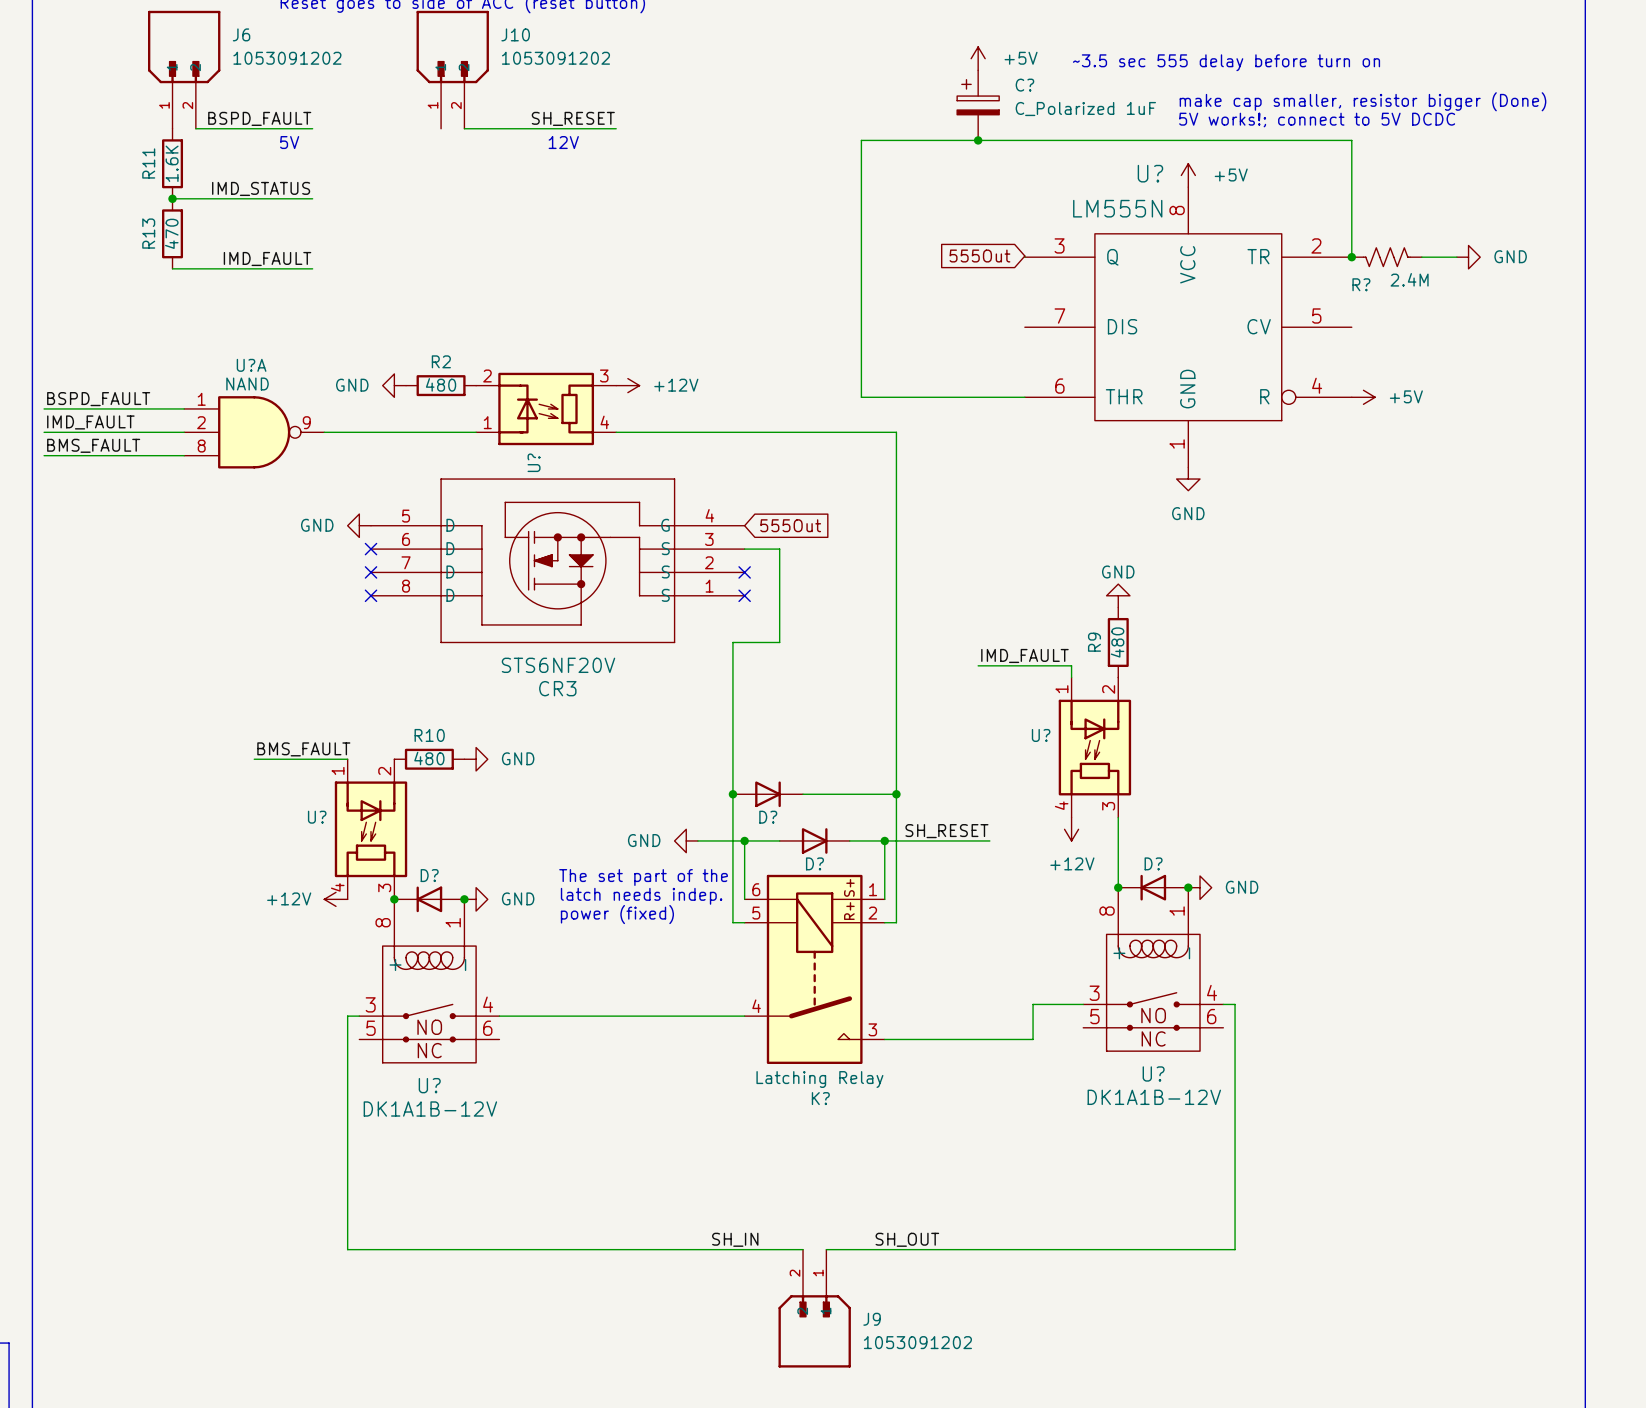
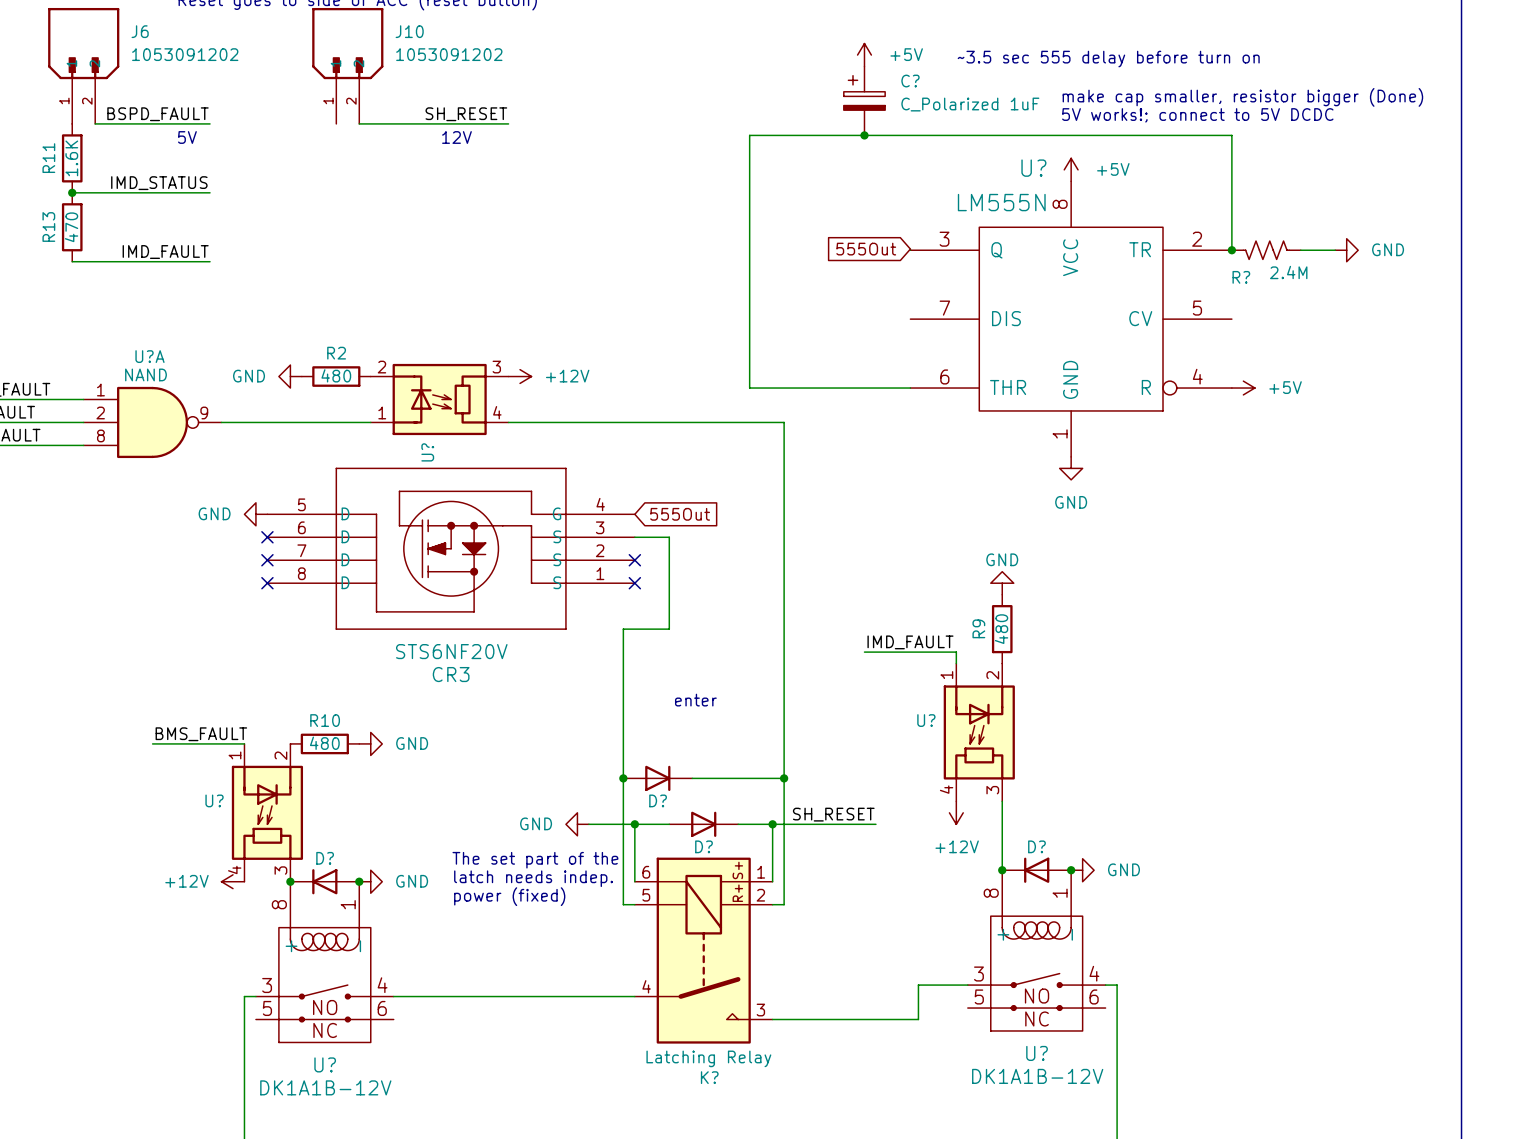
text: none -> enter (695, 700)

